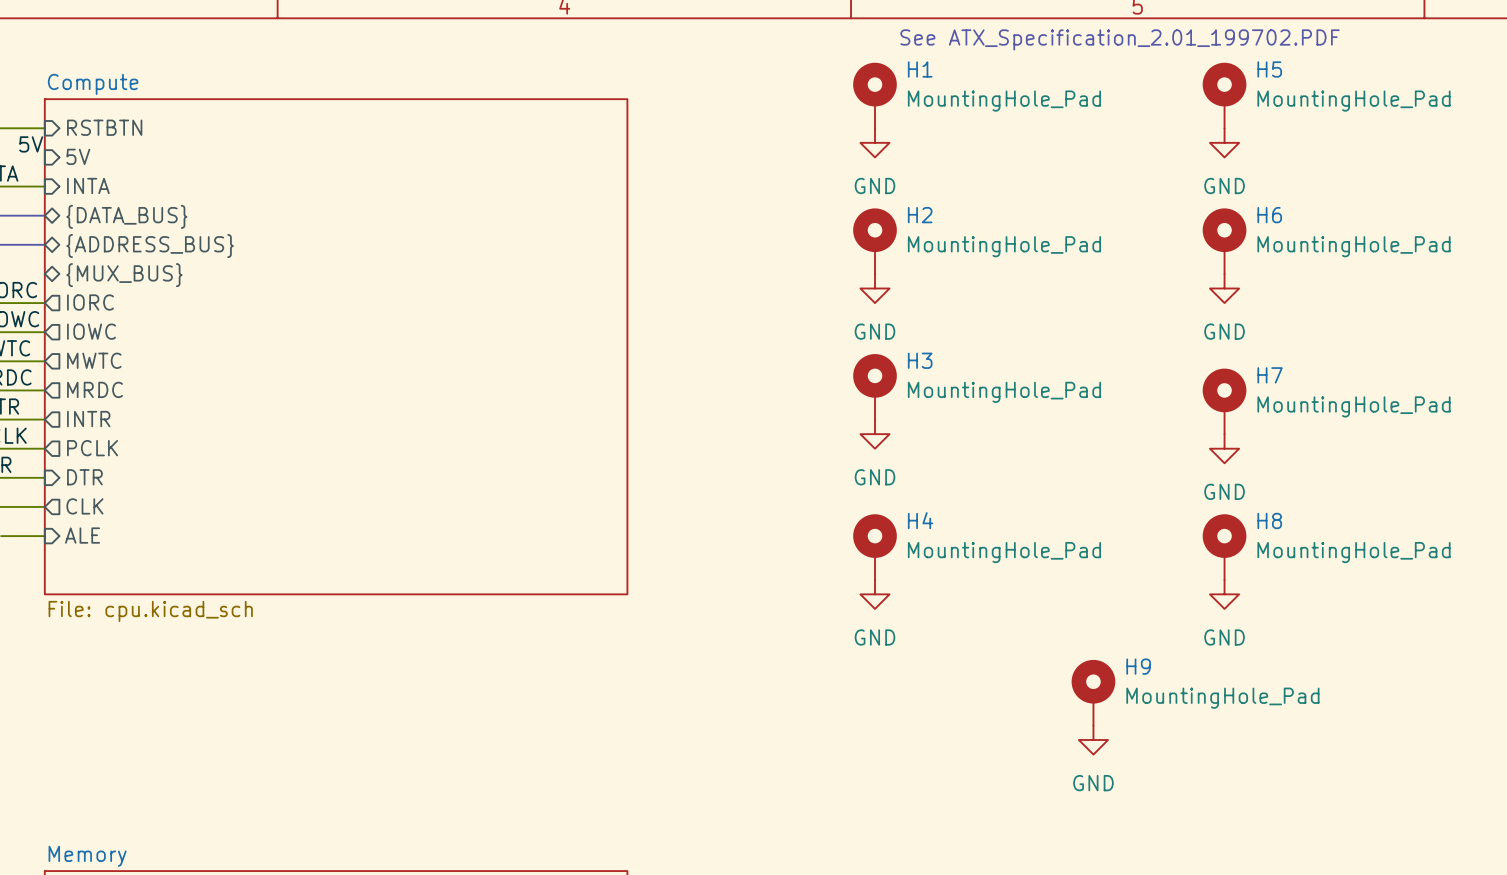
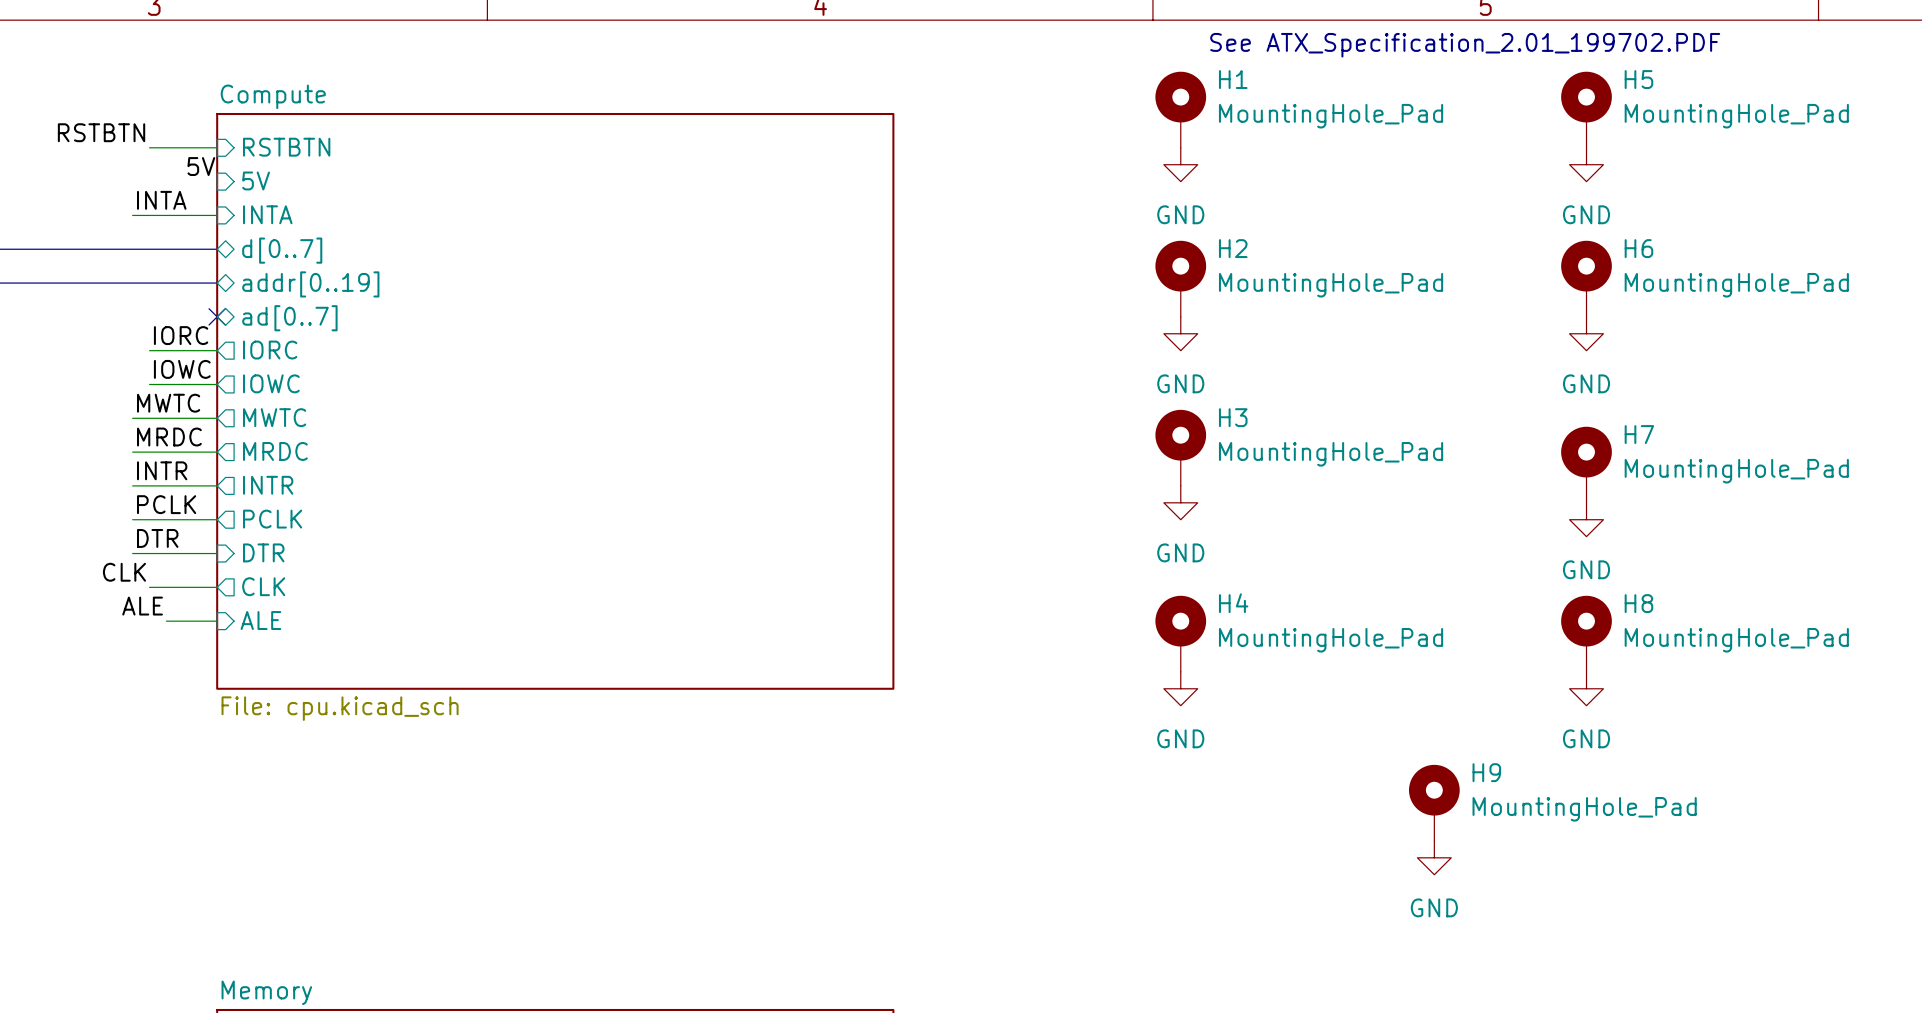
sheet pin: {DATA_BUS} (126, 216) -> d[0..7] (282, 250)
sheet pin: {ADDRESS_BUS} (150, 245) -> addr[0..19] (310, 284)
no-connect mark: none -> (217, 316)
sheet pin: {MUX_BUS} (124, 275) -> ad[0..7] (289, 318)

